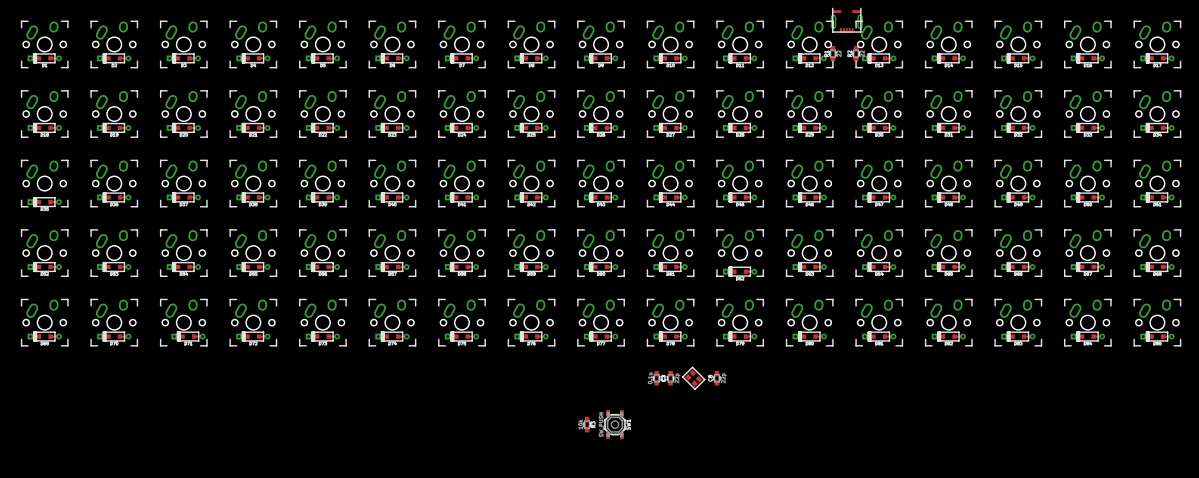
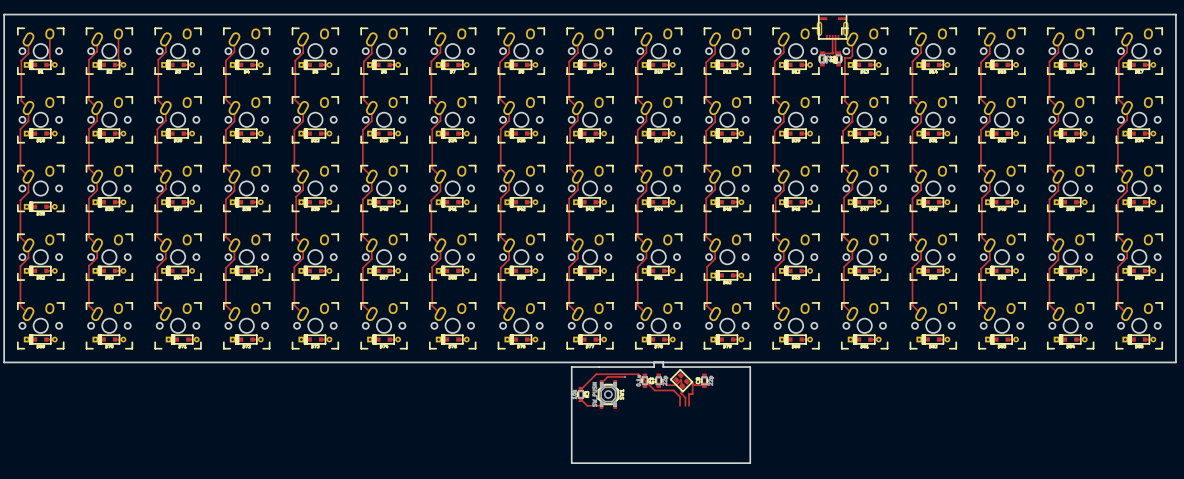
board edge: none -> (4, 14) (1175, 14) (1175, 362) (4, 362) (4, 14)
track: none -> (49, 33) (49, 59) (54, 64)
track: none -> (118, 33) (118, 59) (123, 64)
track: none -> (832, 37) (833, 53) (822, 54)
track: none -> (835, 37) (835, 53) (838, 54)
track: none -> (28, 39) (28, 53) (21, 60) (21, 100) (28, 108) (28, 121) (20, 129) (20, 168) (28, 176) (28, 192) (20, 200) (20, 237) (28, 245) (28, 258) (20, 266) (20, 306) (28, 314)
track: none -> (97, 39) (97, 51) (88, 59) (88, 99) (97, 108) (97, 120) (88, 129) (88, 168) (97, 176) (97, 190) (88, 198) (88, 237) (97, 245) (97, 257) (88, 266) (88, 305) (97, 314)
track: none -> (165, 39) (165, 52) (158, 59) (158, 100) (165, 108) (165, 120) (157, 129) (157, 168) (165, 176) (165, 189) (157, 197) (157, 236) (165, 245) (165, 258) (157, 267) (157, 305) (165, 314)
track: none -> (234, 39) (234, 52) (225, 60) (225, 99) (234, 108) (234, 121) (225, 130) (225, 168) (234, 176) (234, 190) (225, 199) (225, 236) (234, 245) (234, 259) (225, 267) (225, 305) (234, 314)
track: none -> (303, 39) (303, 52) (295, 60) (295, 100) (303, 108) (303, 121) (294, 130) (294, 167) (303, 176) (303, 189) (296, 196) (296, 238) (303, 245) (303, 258) (294, 267) (294, 305) (303, 314)
track: none -> (371, 39) (371, 53) (363, 61) (363, 100) (371, 108) (371, 121) (362, 130) (362, 167) (371, 176) (371, 190) (362, 199) (362, 236) (371, 245) (371, 259) (362, 267) (362, 305) (371, 314)
track: none -> (440, 39) (440, 52) (431, 61) (431, 98) (440, 108) (440, 120) (432, 129) (432, 168) (440, 176) (440, 191) (431, 200) (431, 236) (440, 245) (440, 258) (432, 267) (432, 305) (440, 314)
track: none -> (509, 39) (509, 53) (499, 62) (499, 98) (509, 108) (509, 120) (500, 129) (500, 168) (509, 176) (509, 190) (500, 198) (500, 236) (509, 245) (509, 259) (500, 267) (500, 305) (509, 314)
track: none -> (577, 39) (577, 53) (569, 61) (569, 99) (577, 108) (577, 120) (570, 128) (570, 169) (577, 176) (577, 189) (569, 198) (569, 236) (577, 245) (577, 258) (569, 267) (569, 305) (577, 314)
track: none -> (646, 39) (646, 52) (637, 61) (637, 99) (646, 108) (646, 121) (637, 130) (637, 167) (646, 176) (646, 190) (637, 199) (637, 236) (646, 245) (646, 258) (637, 267) (637, 305) (646, 314)
track: none -> (715, 39) (715, 53) (706, 62) (706, 99) (715, 108) (715, 122) (706, 130) (706, 167) (715, 176) (715, 189) (706, 198) (706, 236) (715, 245) (715, 259) (707, 267) (707, 306) (715, 314)
track: none -> (783, 39) (783, 52) (774, 61) (774, 98) (783, 108) (783, 121) (774, 130) (774, 167) (783, 176) (783, 190) (775, 198) (775, 237) (783, 245) (783, 259) (775, 267) (775, 305) (783, 314)
track: none -> (852, 39) (852, 55) (844, 57) (844, 101) (852, 108) (852, 121) (843, 130) (843, 167) (852, 176) (852, 189) (844, 197) (844, 236) (852, 245) (852, 258) (844, 267) (844, 305) (852, 314)
track: none -> (921, 39) (921, 53) (912, 61) (912, 99) (921, 108) (921, 122) (912, 130) (912, 168) (921, 176) (921, 189) (912, 198) (912, 236) (921, 245) (921, 259) (912, 267) (912, 305) (921, 314)
track: none -> (989, 39) (989, 53) (980, 62) (980, 99) (989, 108) (989, 121) (980, 130) (980, 167) (989, 176) (989, 190) (981, 198) (981, 237) (989, 245) (989, 260) (980, 268) (980, 305) (989, 314)
track: none -> (1058, 39) (1058, 52) (1049, 61) (1049, 99) (1058, 108) (1058, 121) (1050, 129) (1050, 168) (1058, 176) (1058, 190) (1049, 199) (1049, 236) (1058, 245) (1058, 259) (1049, 268) (1049, 305) (1058, 314)
track: none -> (1127, 39) (1127, 52) (1118, 60) (1118, 99) (1127, 108) (1127, 120) (1117, 129) (1117, 167) (1127, 176) (1127, 191) (1117, 200) (1117, 236) (1127, 245) (1127, 257) (1117, 267) (1117, 304) (1127, 314)
part position: (832, 53) -> (838, 58)
part position: (856, 53) -> (822, 58)
board edge: none -> (654, 362) (654, 367) (571, 367) (571, 463) (750, 463) (750, 367) (663, 367) (663, 362)
track: none -> (625, 376) (607, 376) (601, 383)
via: none -> (625, 376)
track: none -> (691, 381) (694, 385) (709, 385)
track: none -> (692, 383) (692, 394) (689, 394) (689, 405)
track: none -> (667, 385) (676, 385) (681, 379) (681, 393) (685, 397) (685, 405)
track: none -> (580, 389) (596, 374) (638, 374) (654, 390) (673, 390) (680, 396) (680, 405)
track: none -> (580, 399) (587, 405) (601, 405)
part position: (587, 424) -> (580, 394)
part position: (614, 424) -> (608, 394)

